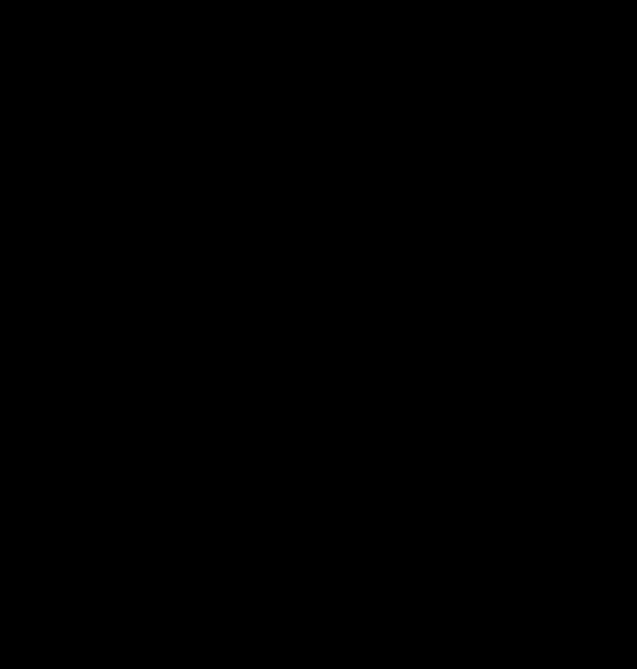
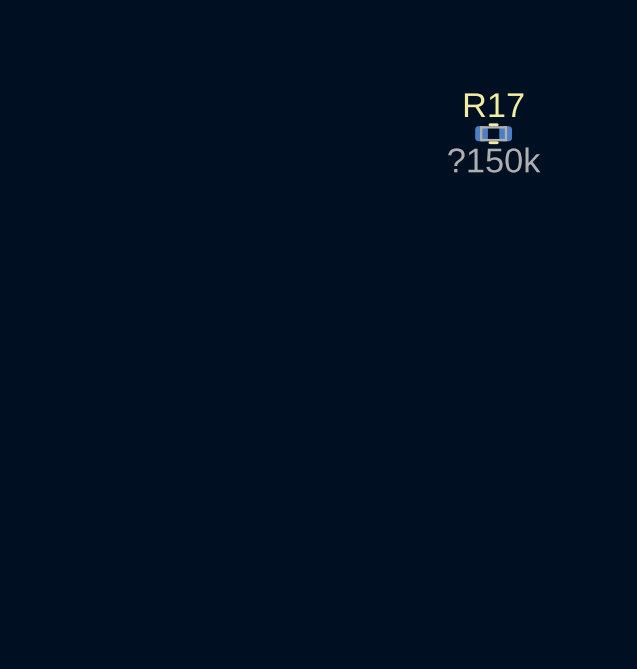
R17: none -> ?150k (493, 133)

